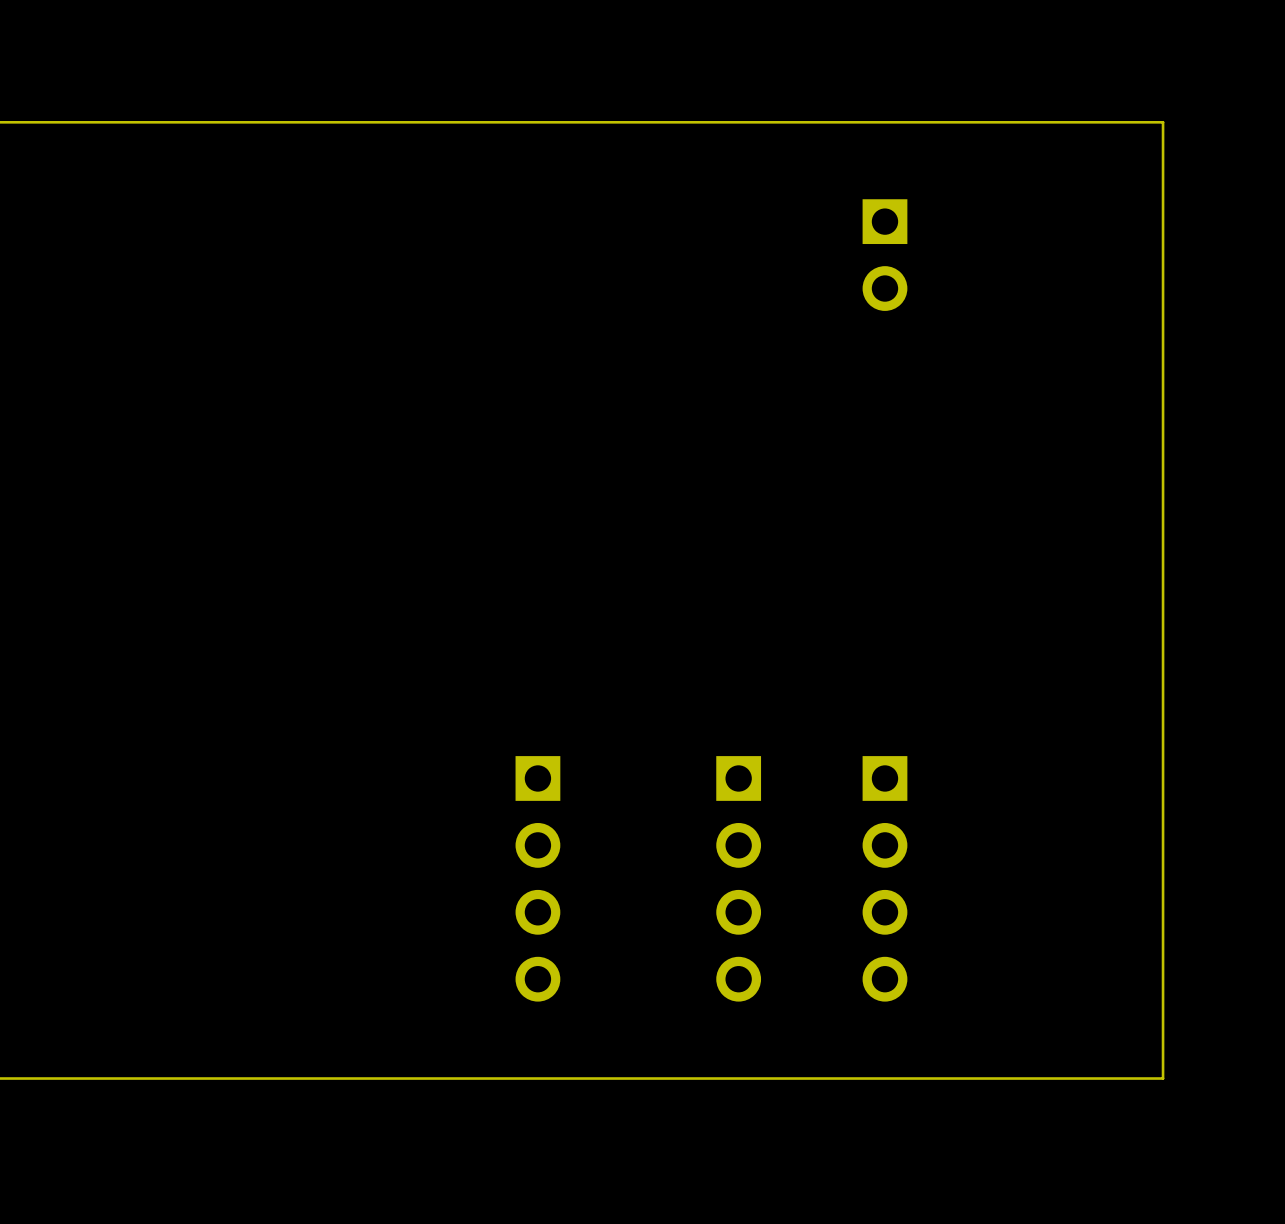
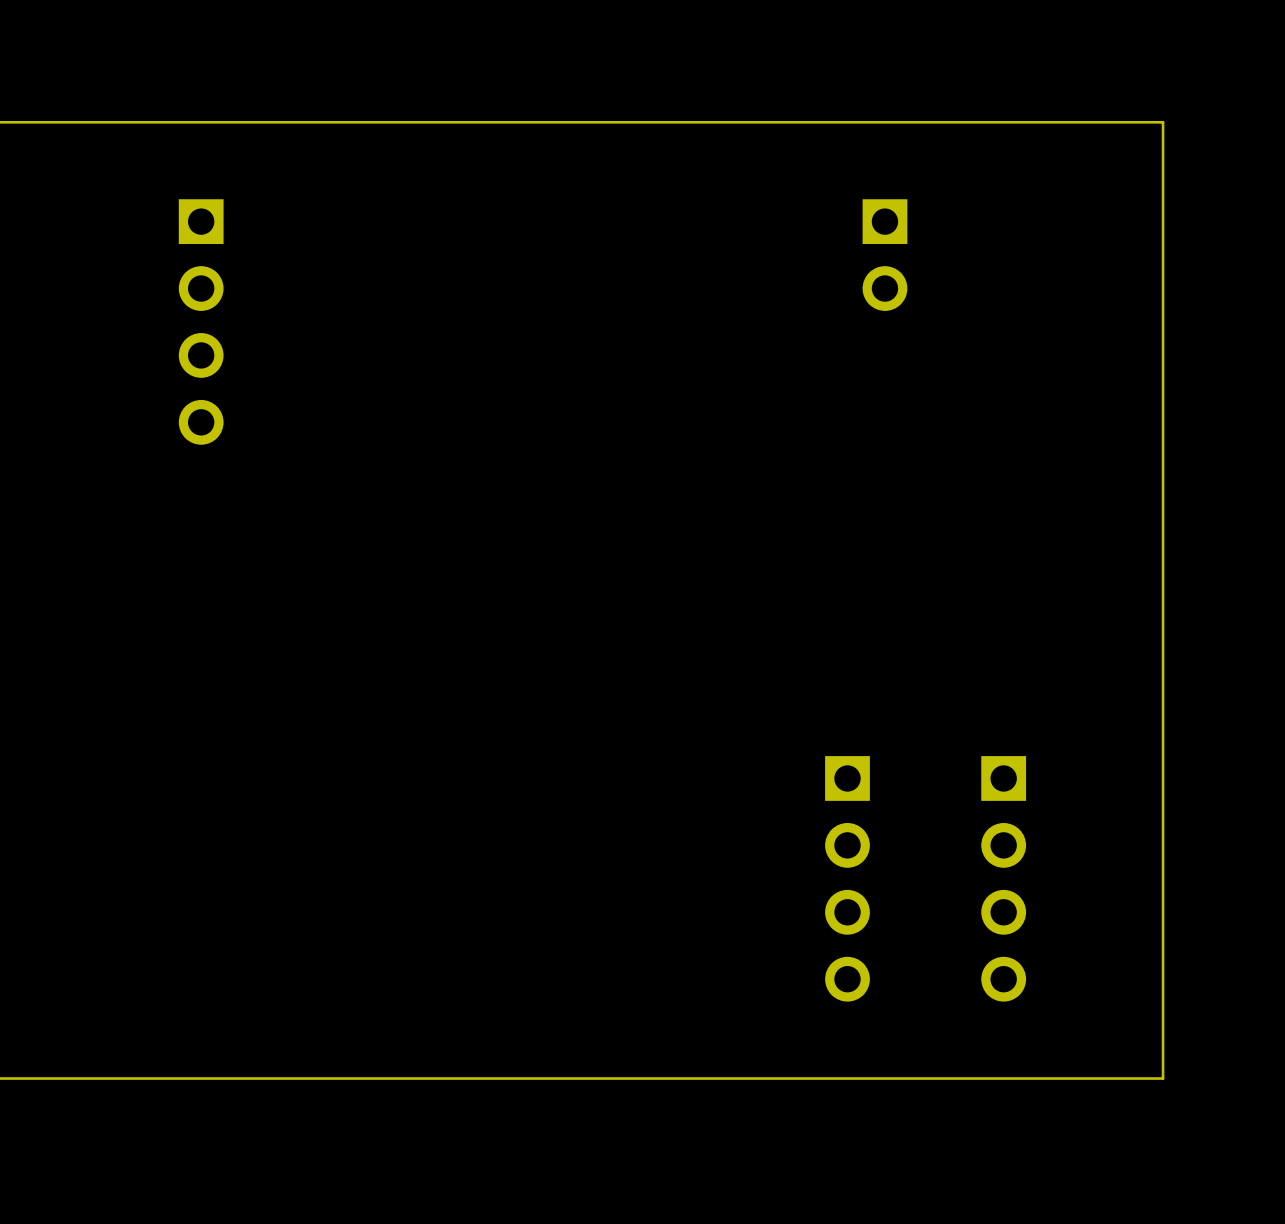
part: none -> (201, 321)
part: (537, 878) -> none
part: (738, 878) -> none
part position: (884, 878) -> (847, 878)
part: none -> (1003, 878)

